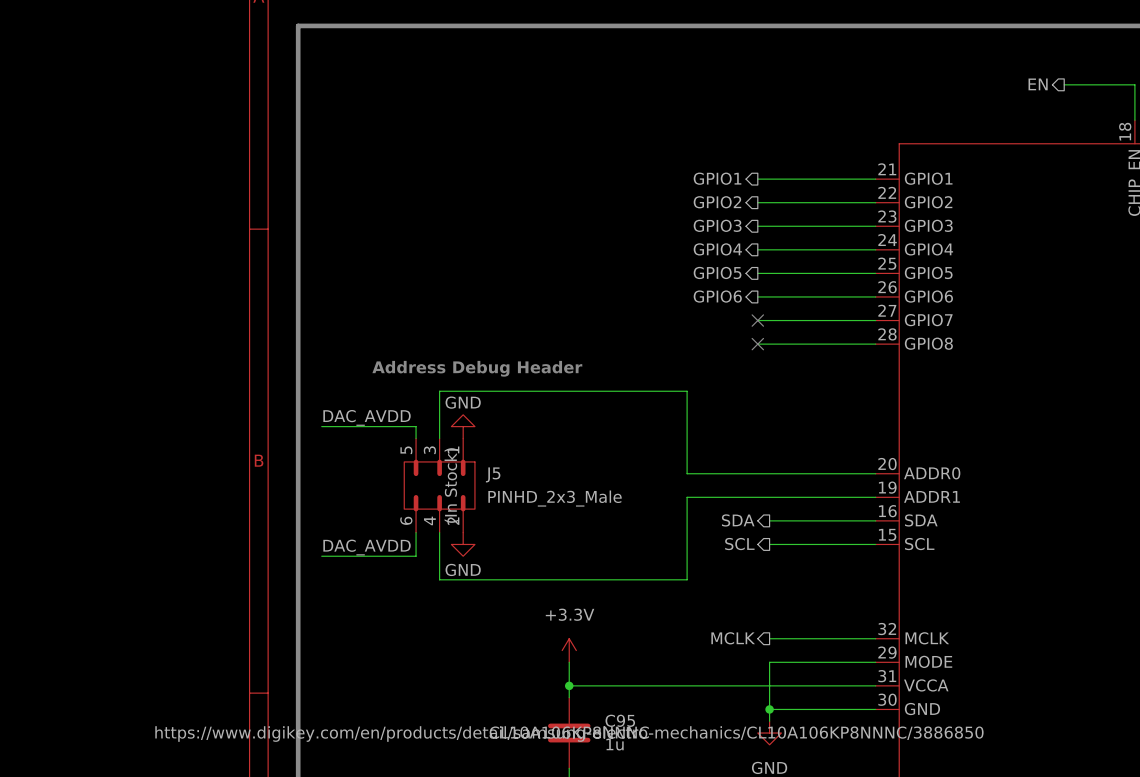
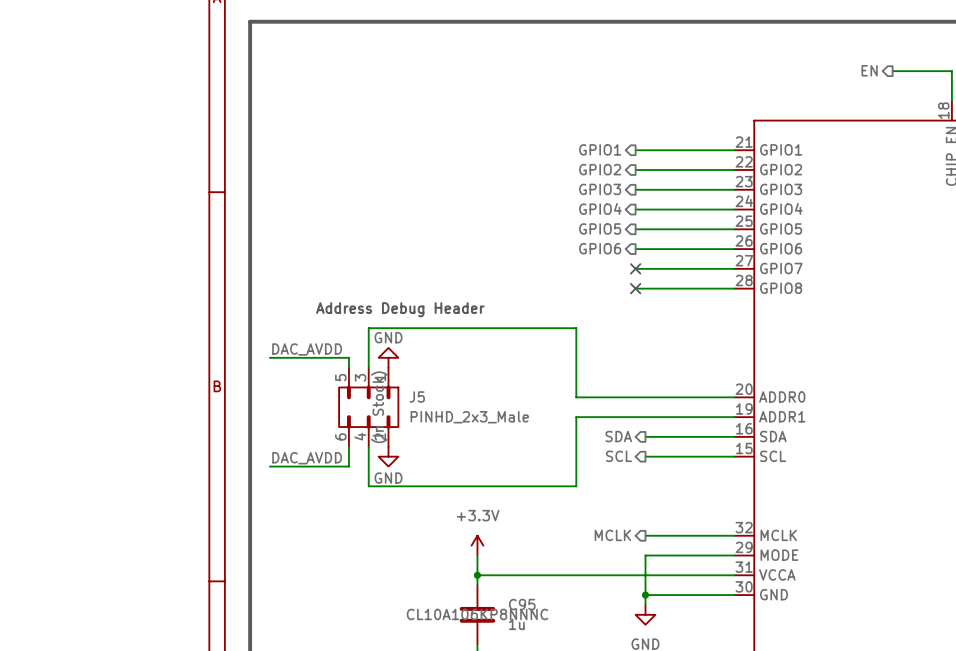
C95 text: https://www.digikey.com/en/products/detail/samsung-electro-mechanics/CL10A106KP8NNNC/3886850 (569, 734) -> none

